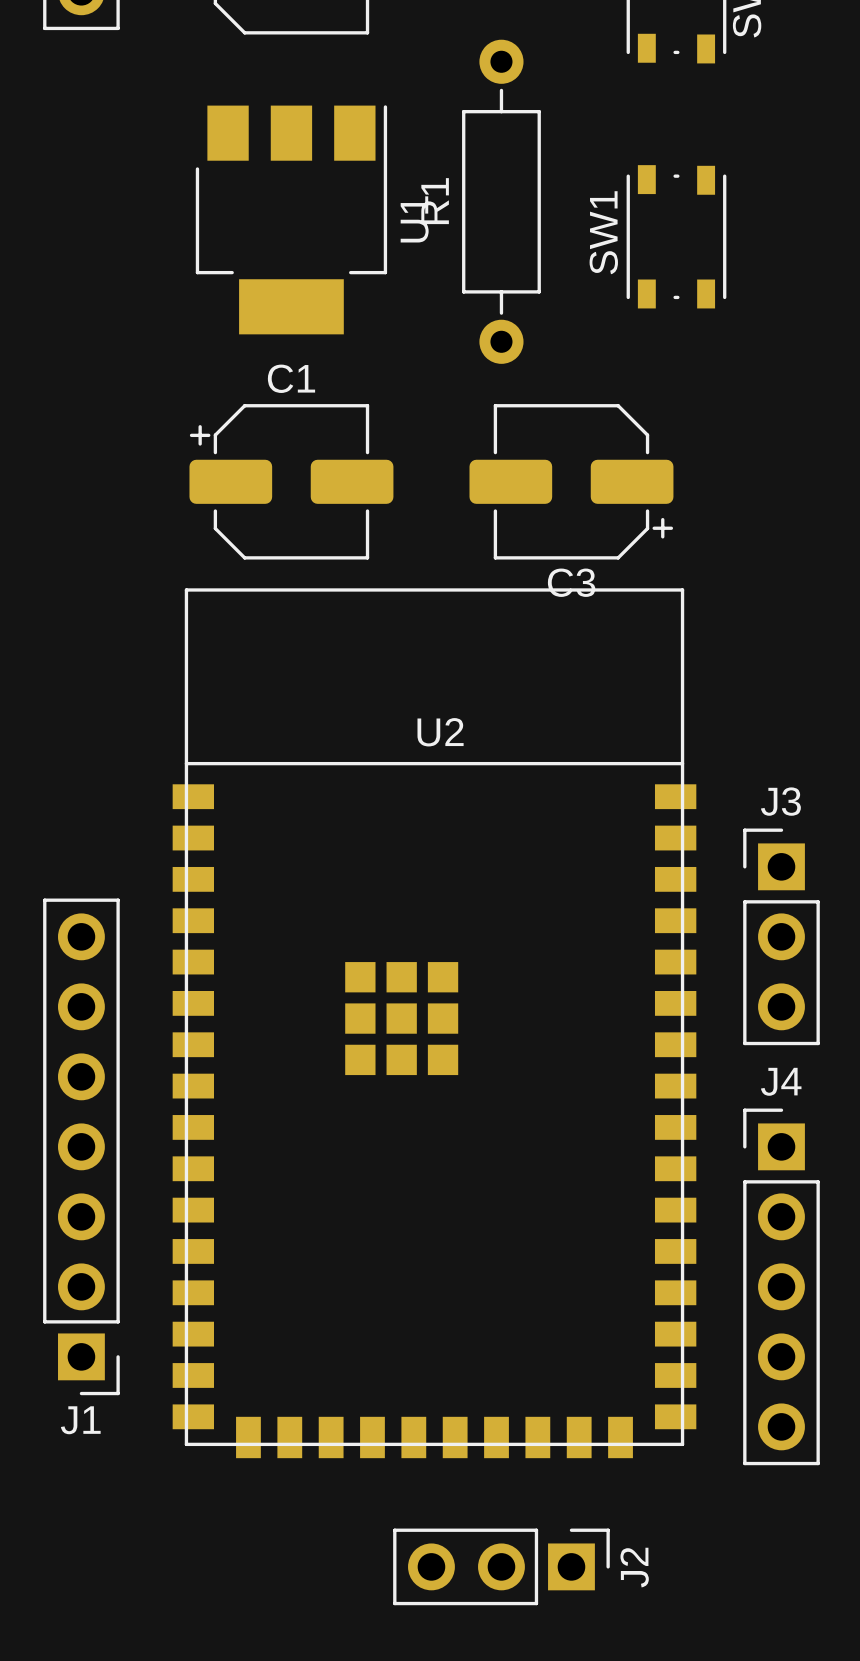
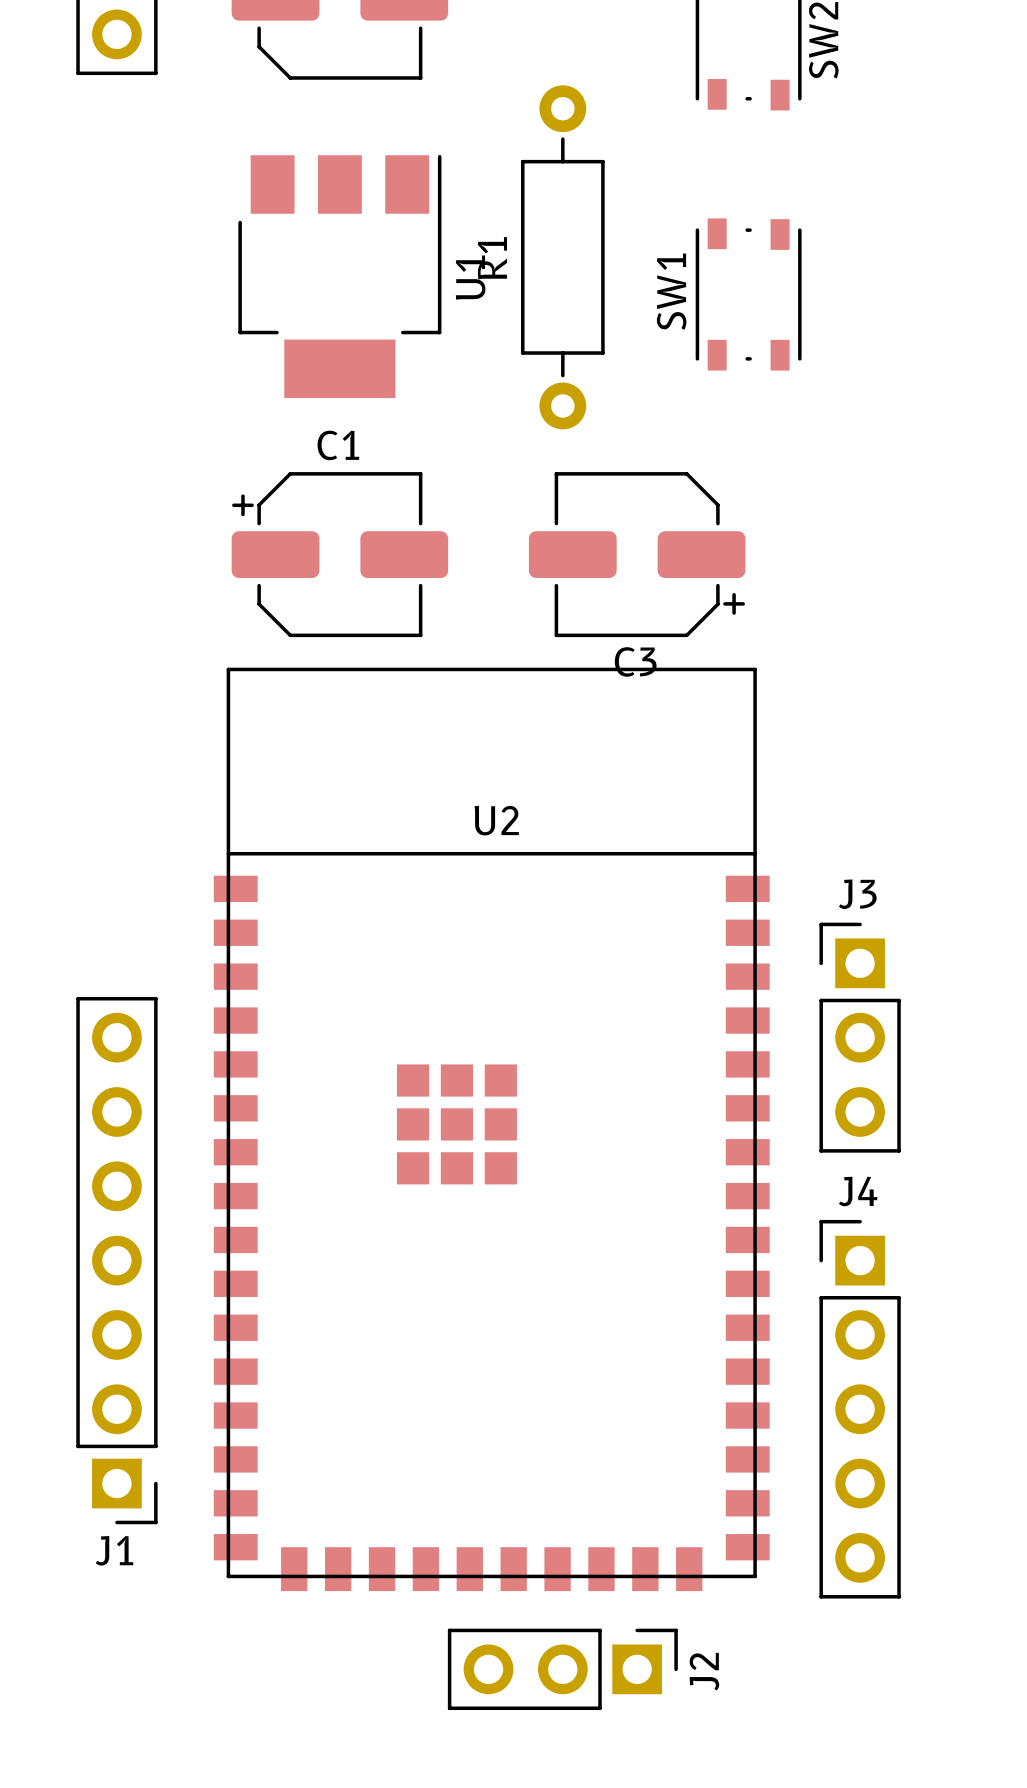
J2 position: (501, 1566) -> (562, 1669)

